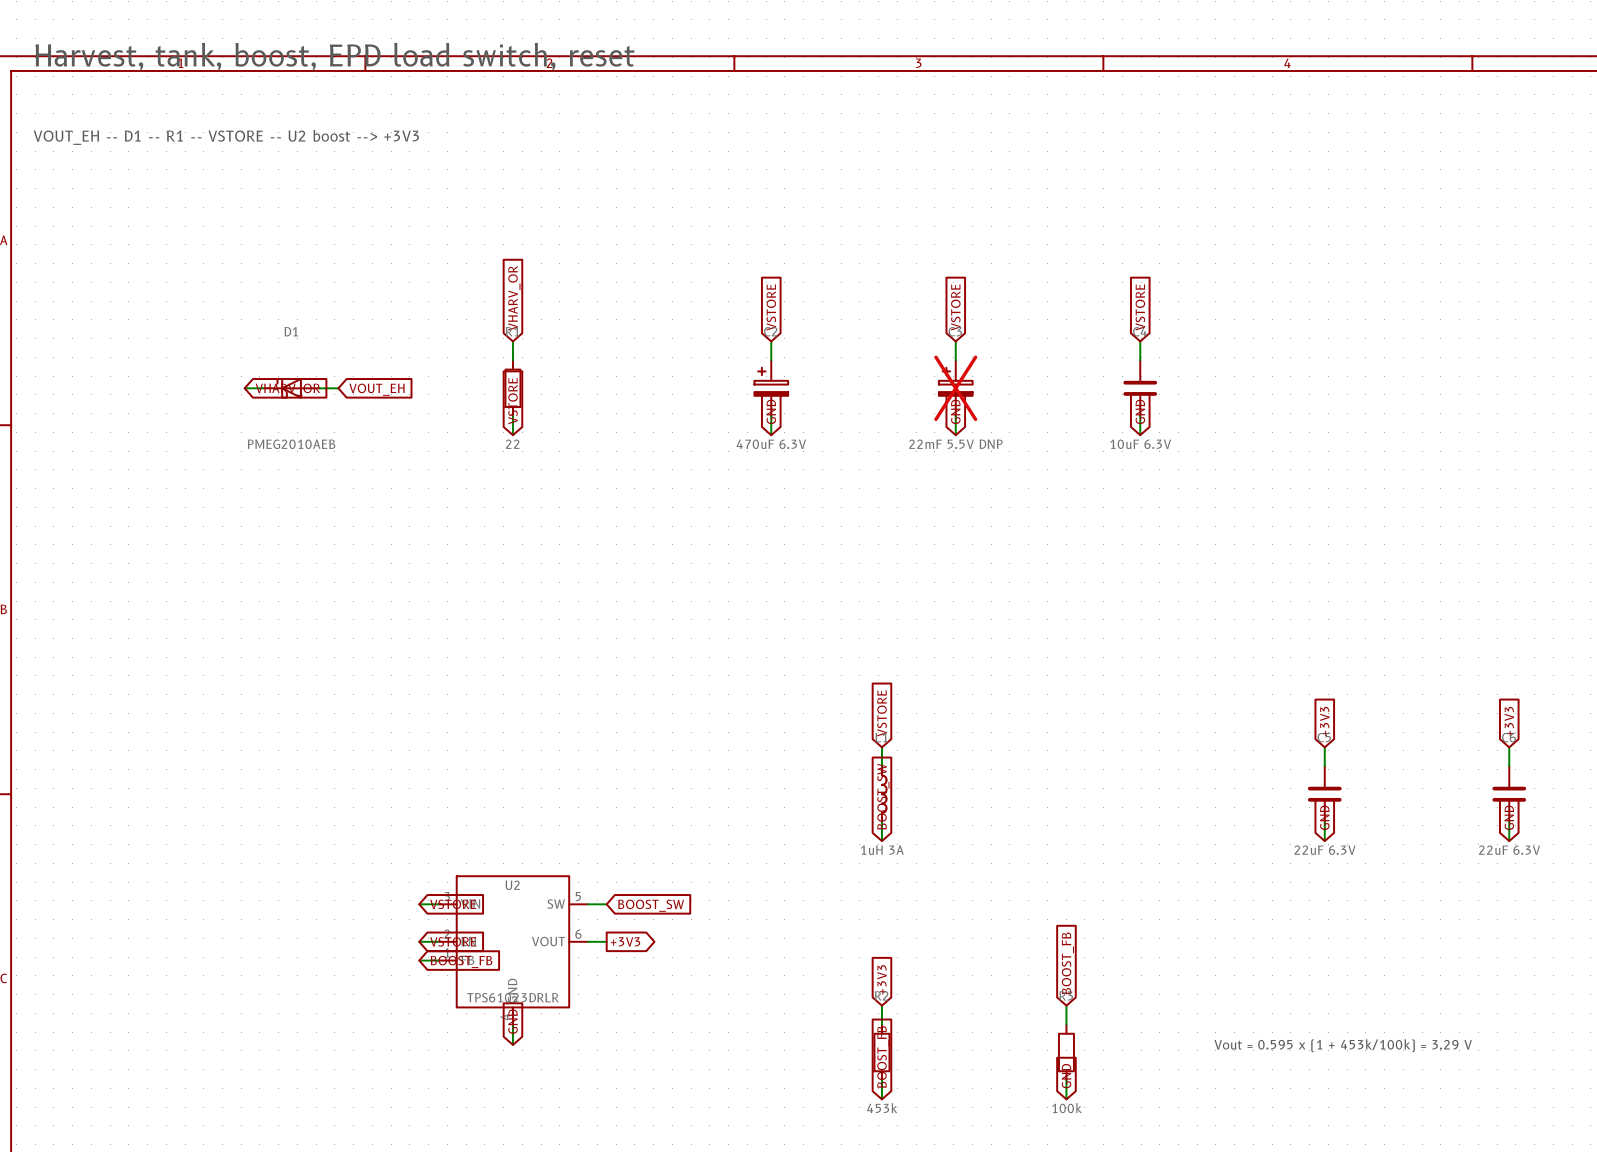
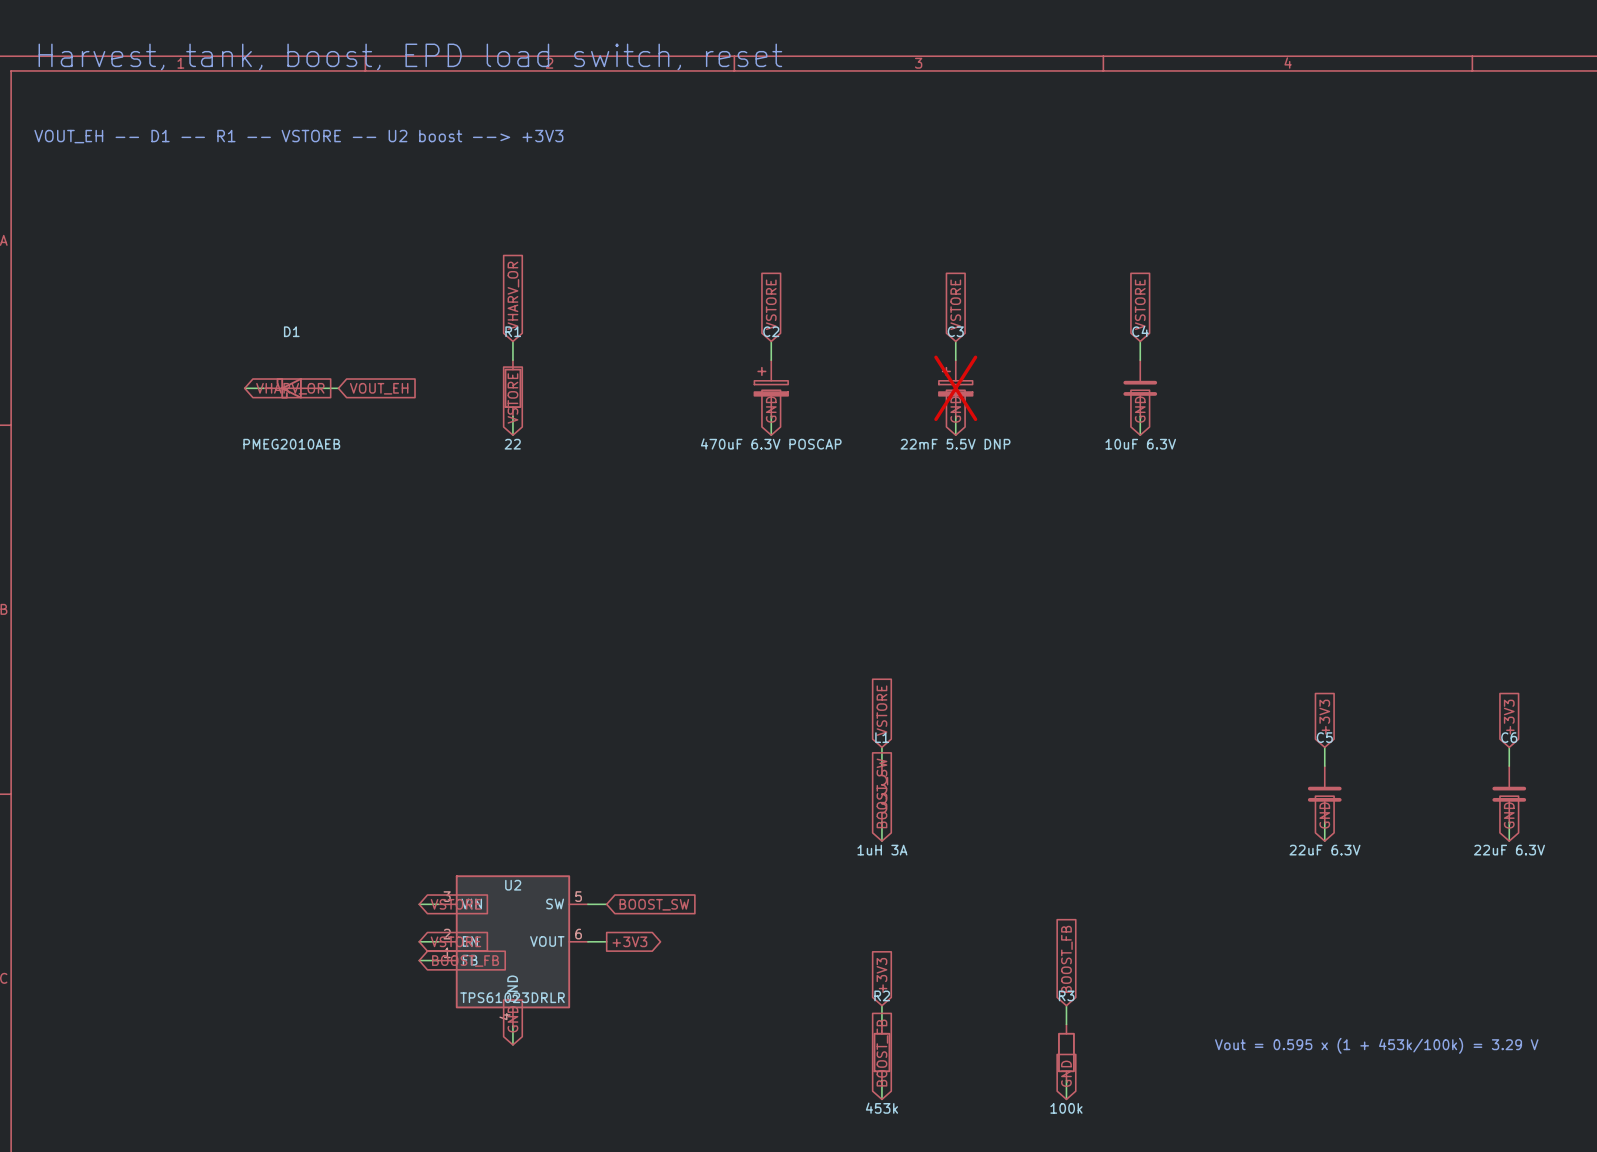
C2 value: 470uF 6.3V (771, 444) -> 470uF 6.3V POSCAP (771, 443)

